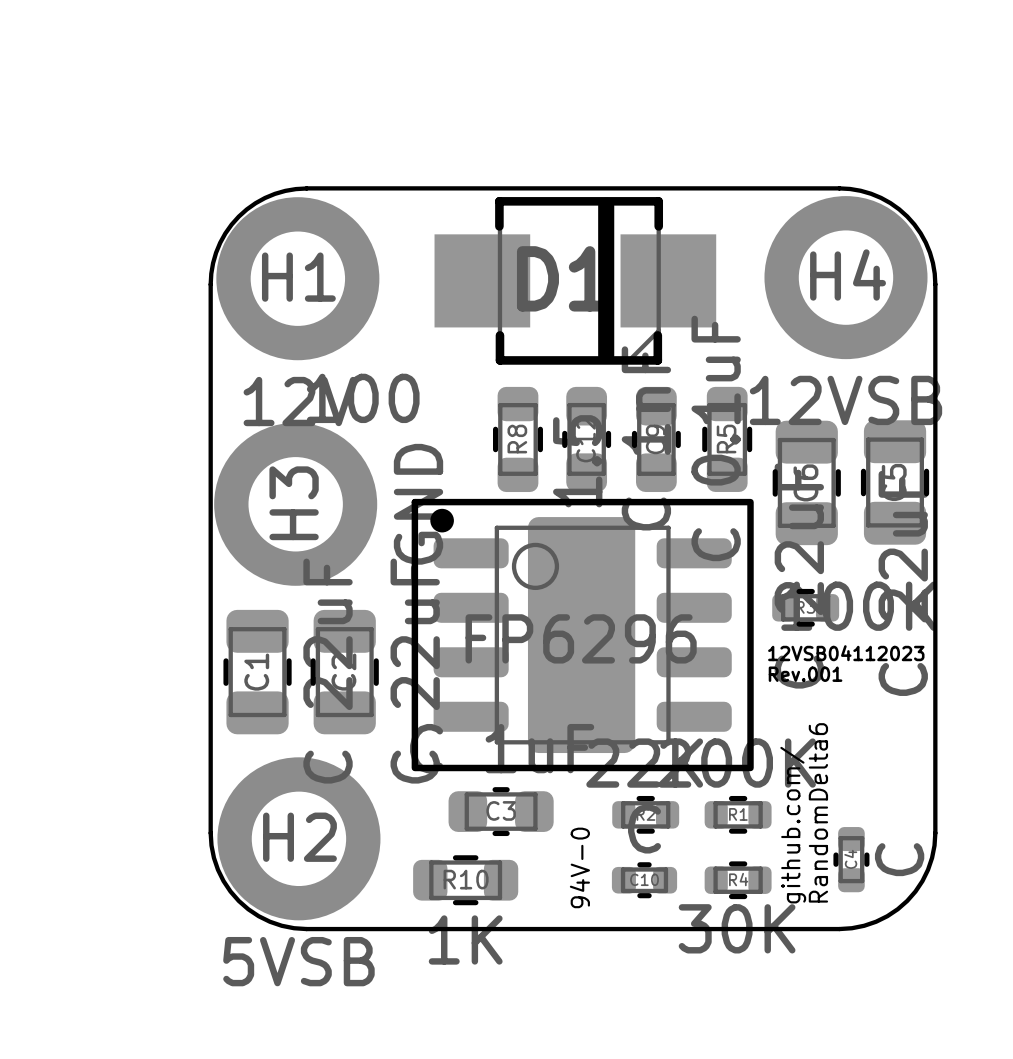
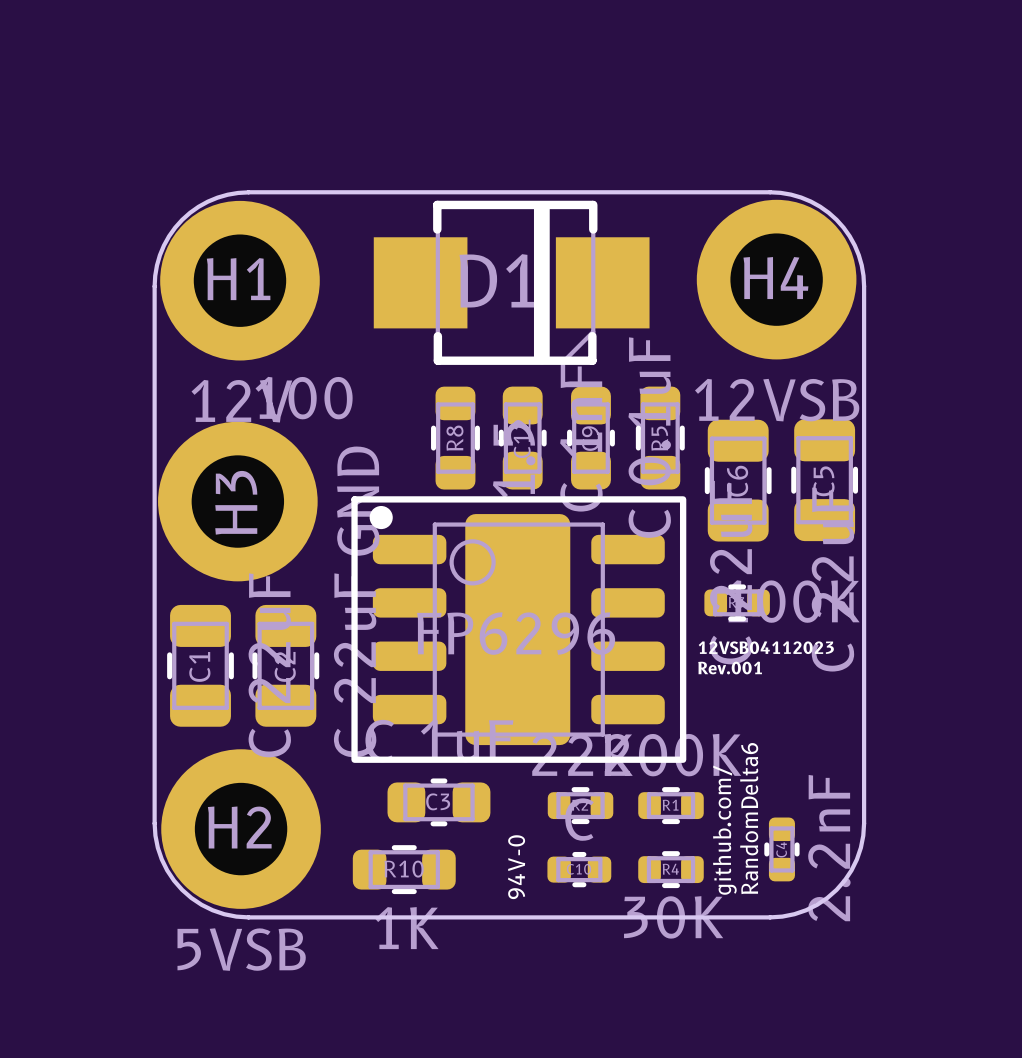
C4 value: C (899, 859) -> 2.2nF (829, 848)

